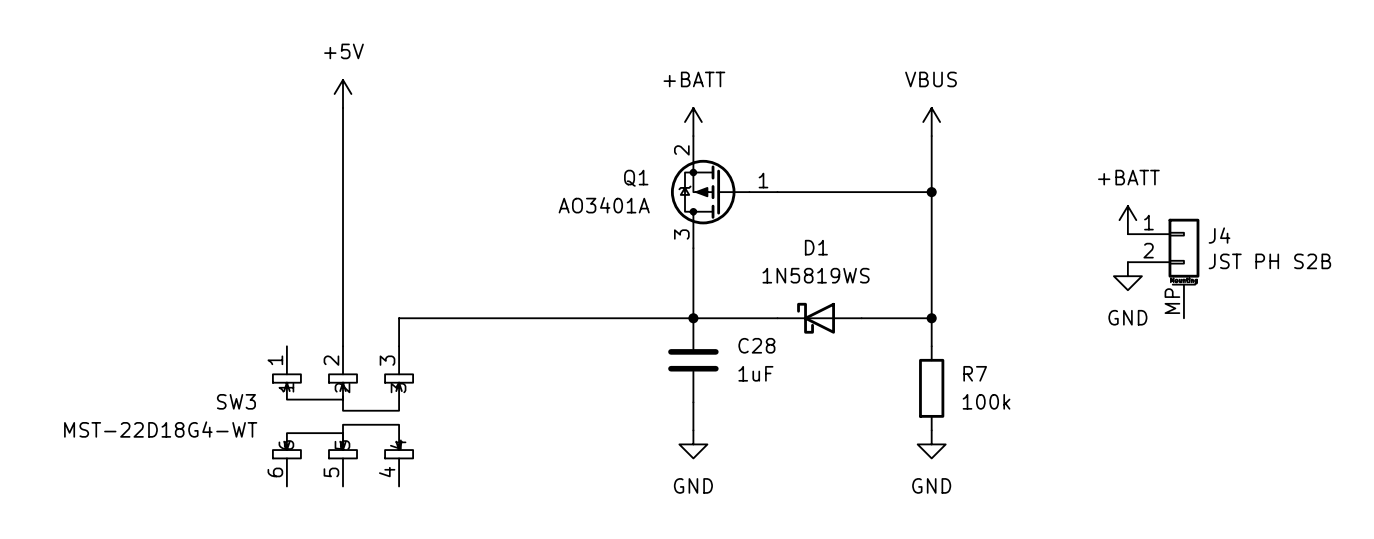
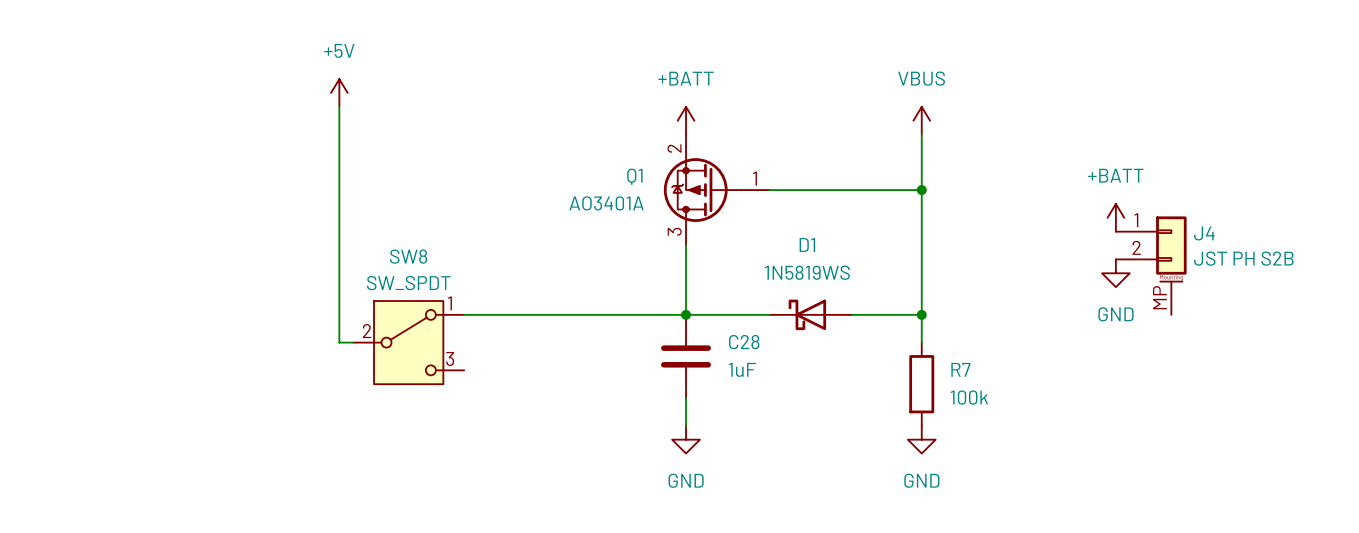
wire: none -> (339, 342) (353, 342)
SW8: none -> SW_SPDT (408, 342)
SW3: MST-22D18G4-WT (343, 416) -> none

